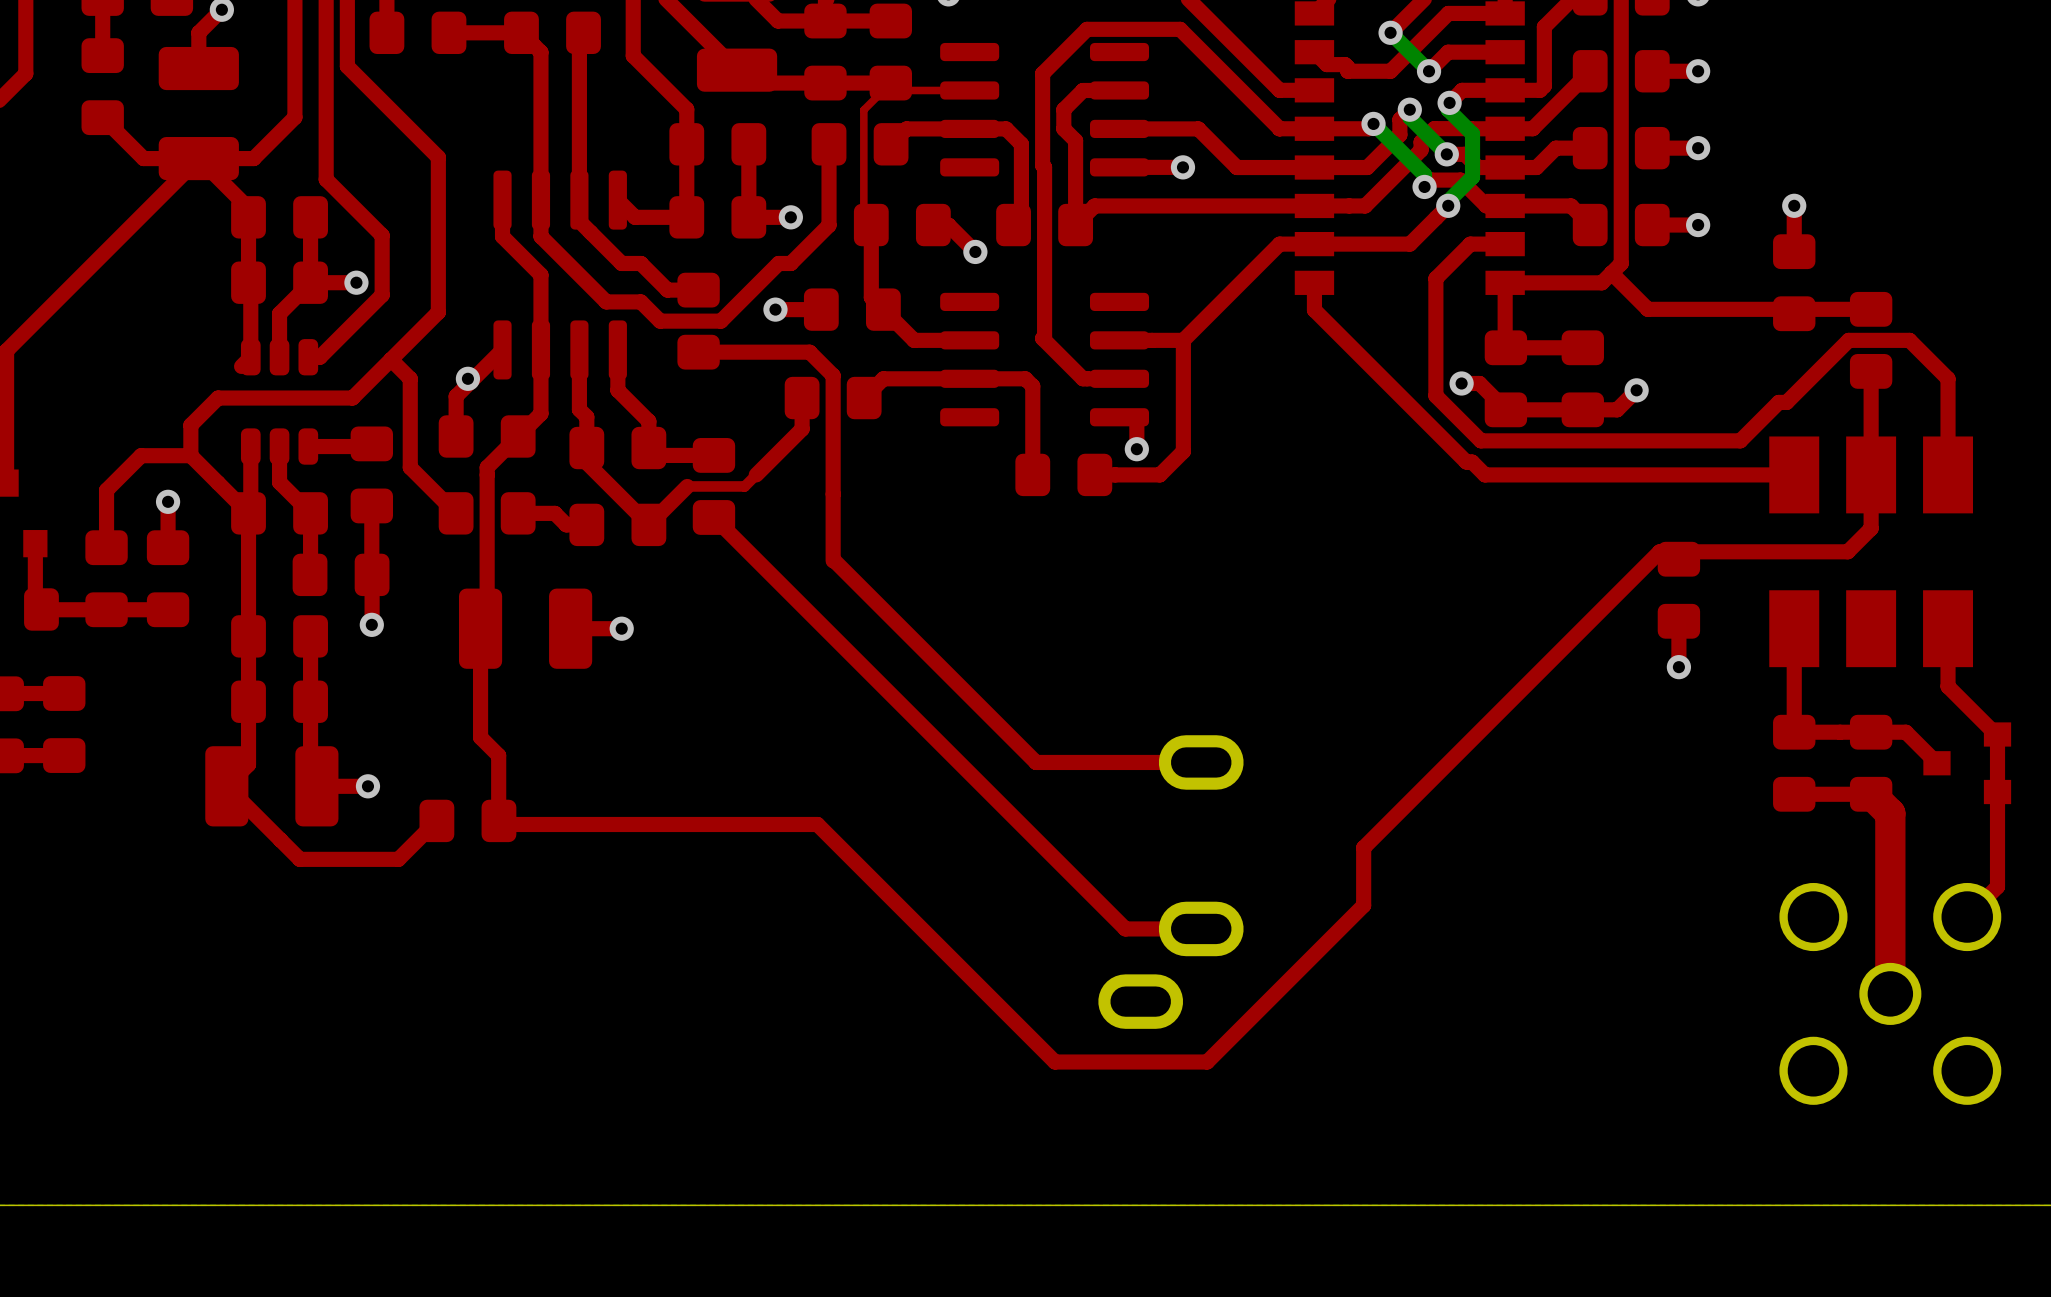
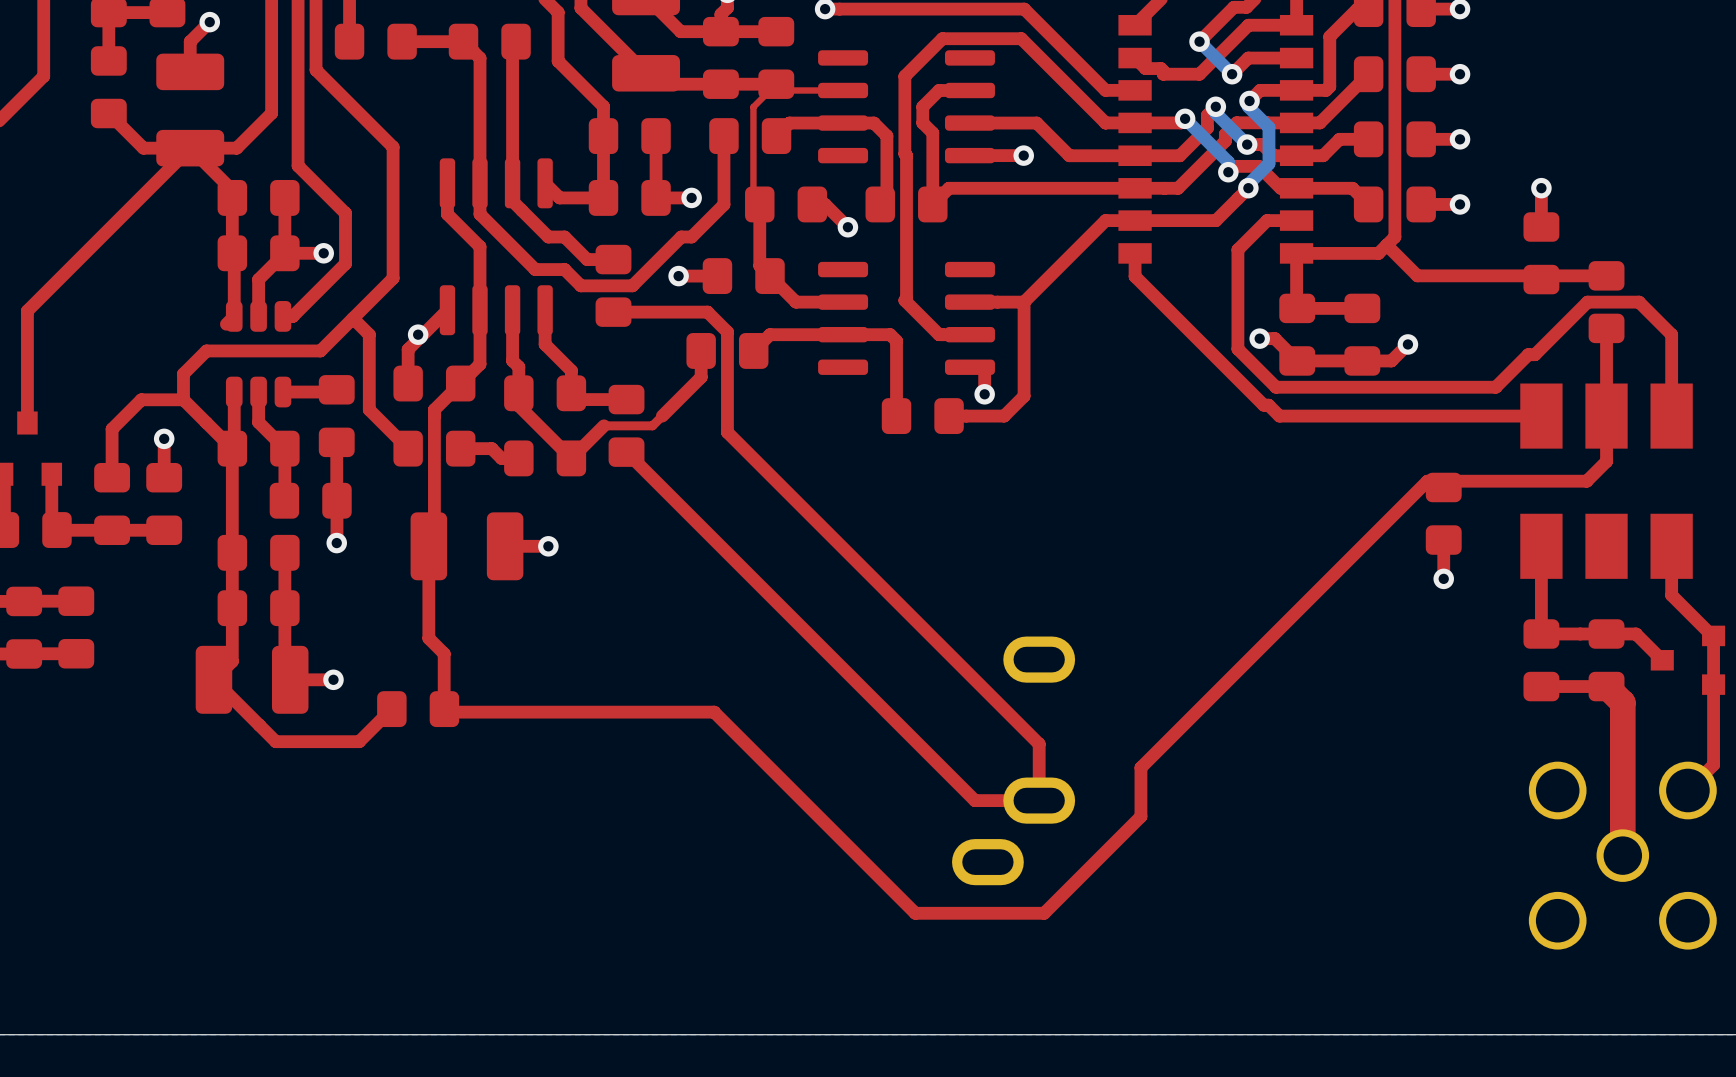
top track: (833, 494) (833, 560) (1036, 762) (1201, 762) -> (727, 432) (1039, 744) (1039, 800)
top track: (1363, 847) (1363, 905) (1321, 947) -> (1176, 731) (1140, 767) (1140, 816)

